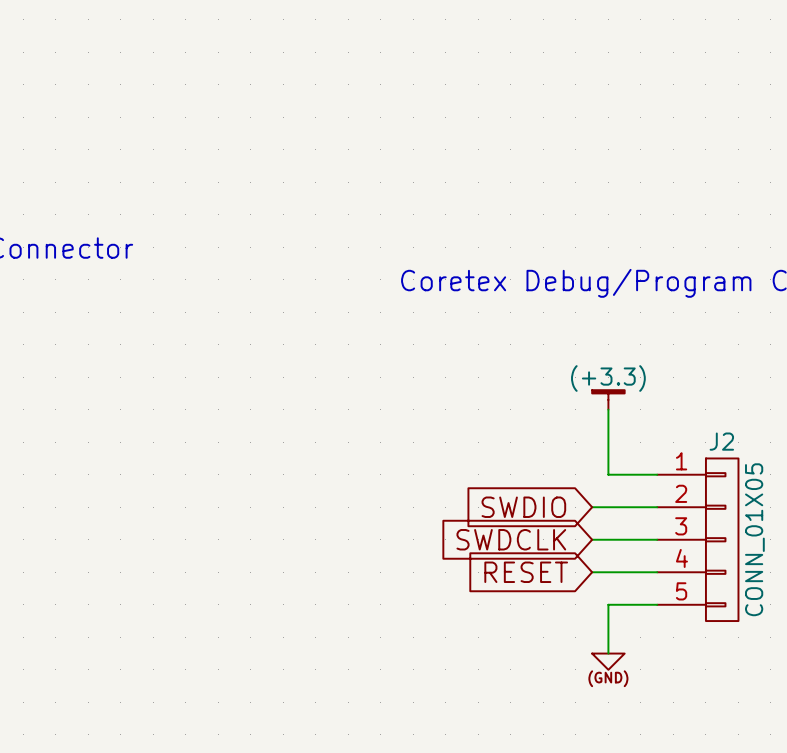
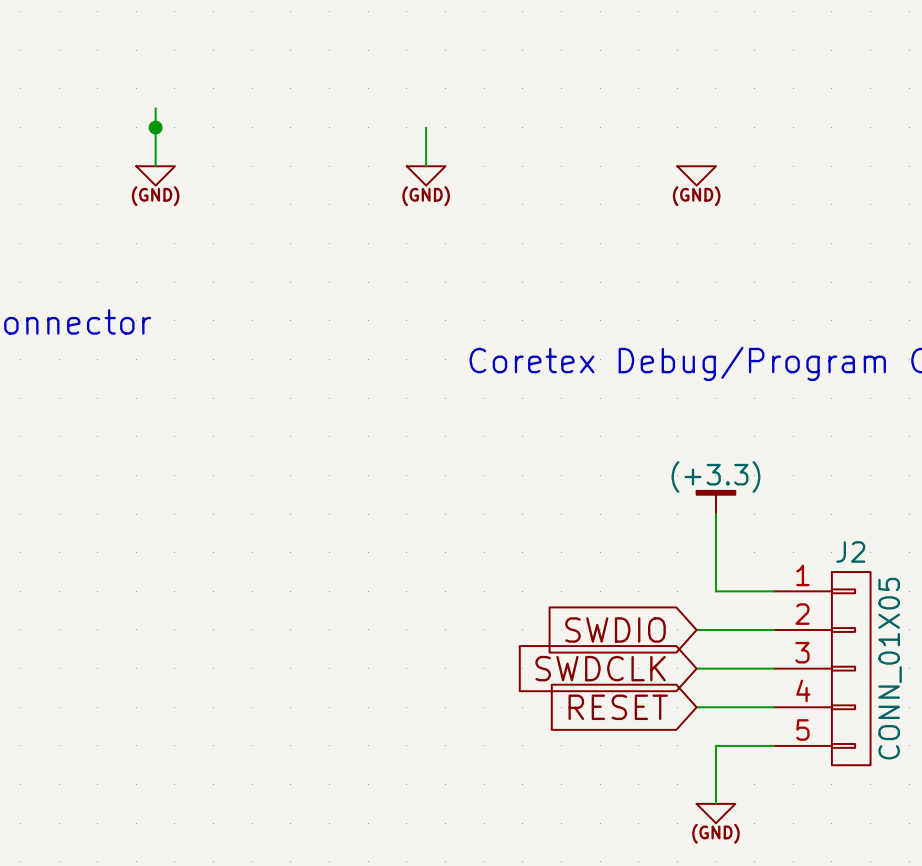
wire: none -> (155, 108) (155, 166)
junction: none -> (155, 127)
wire: none -> (426, 127) (426, 166)
power symbol: none -> (155, 175)
power symbol: none -> (426, 175)
power symbol: none -> (696, 175)

